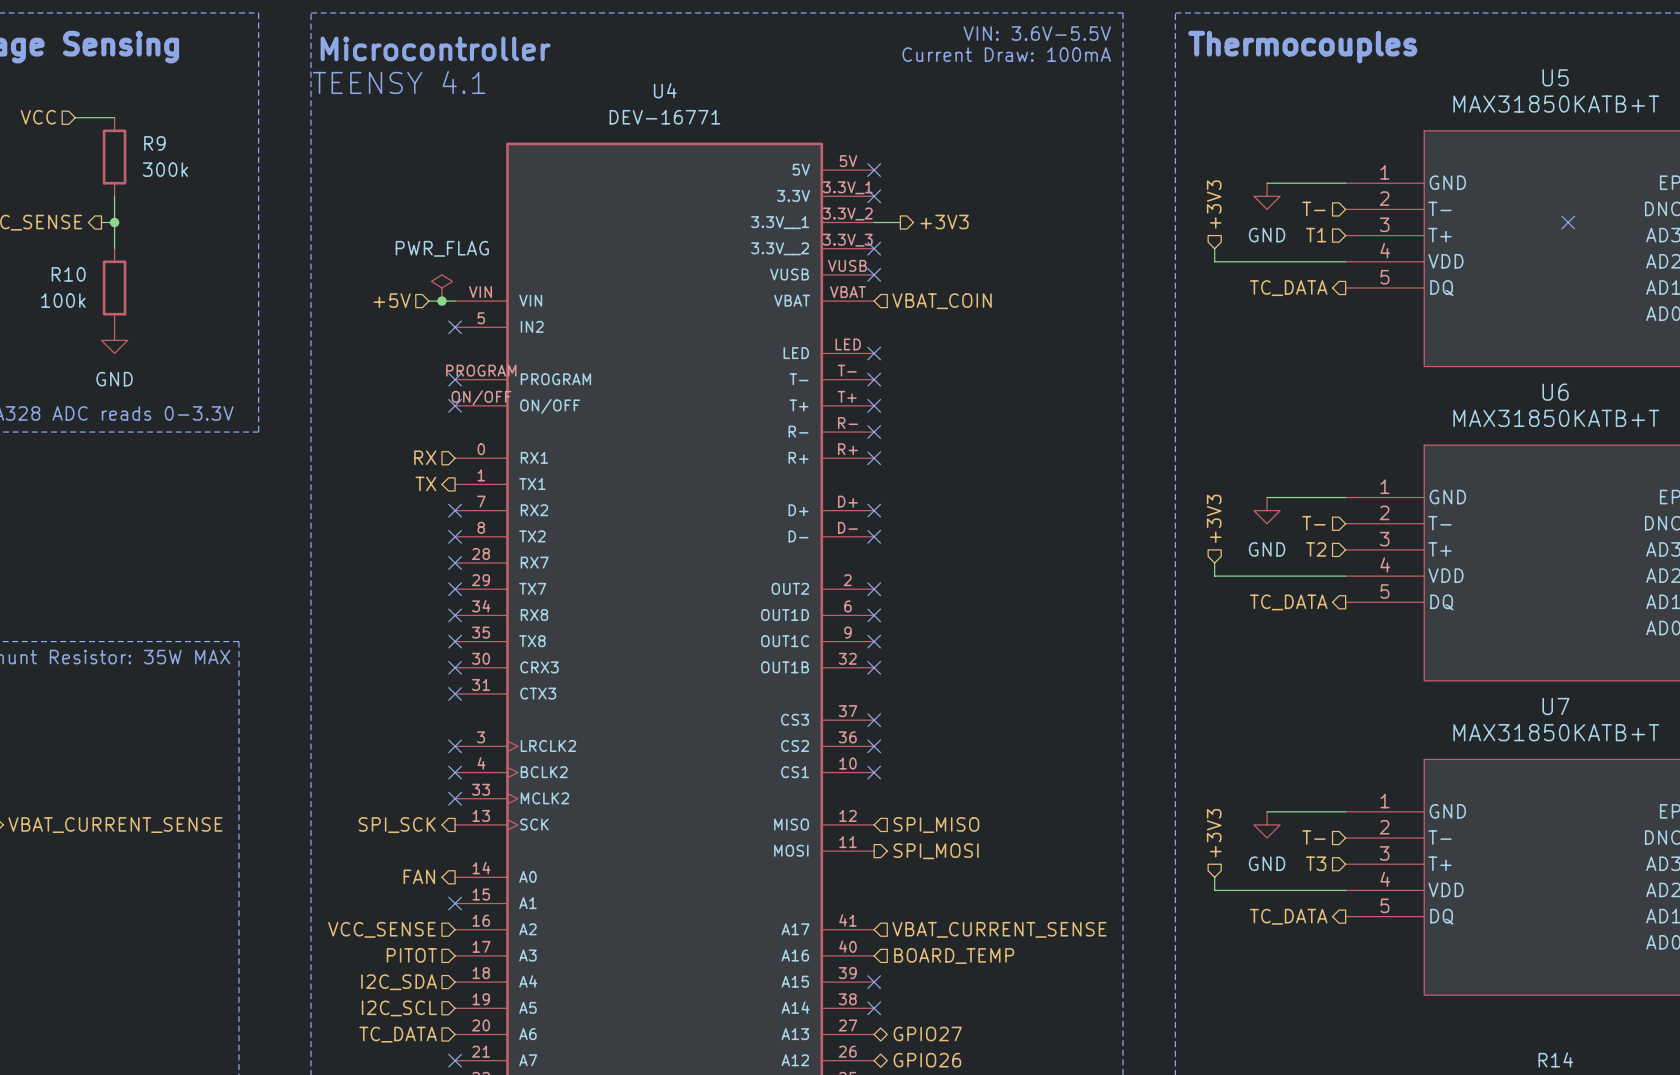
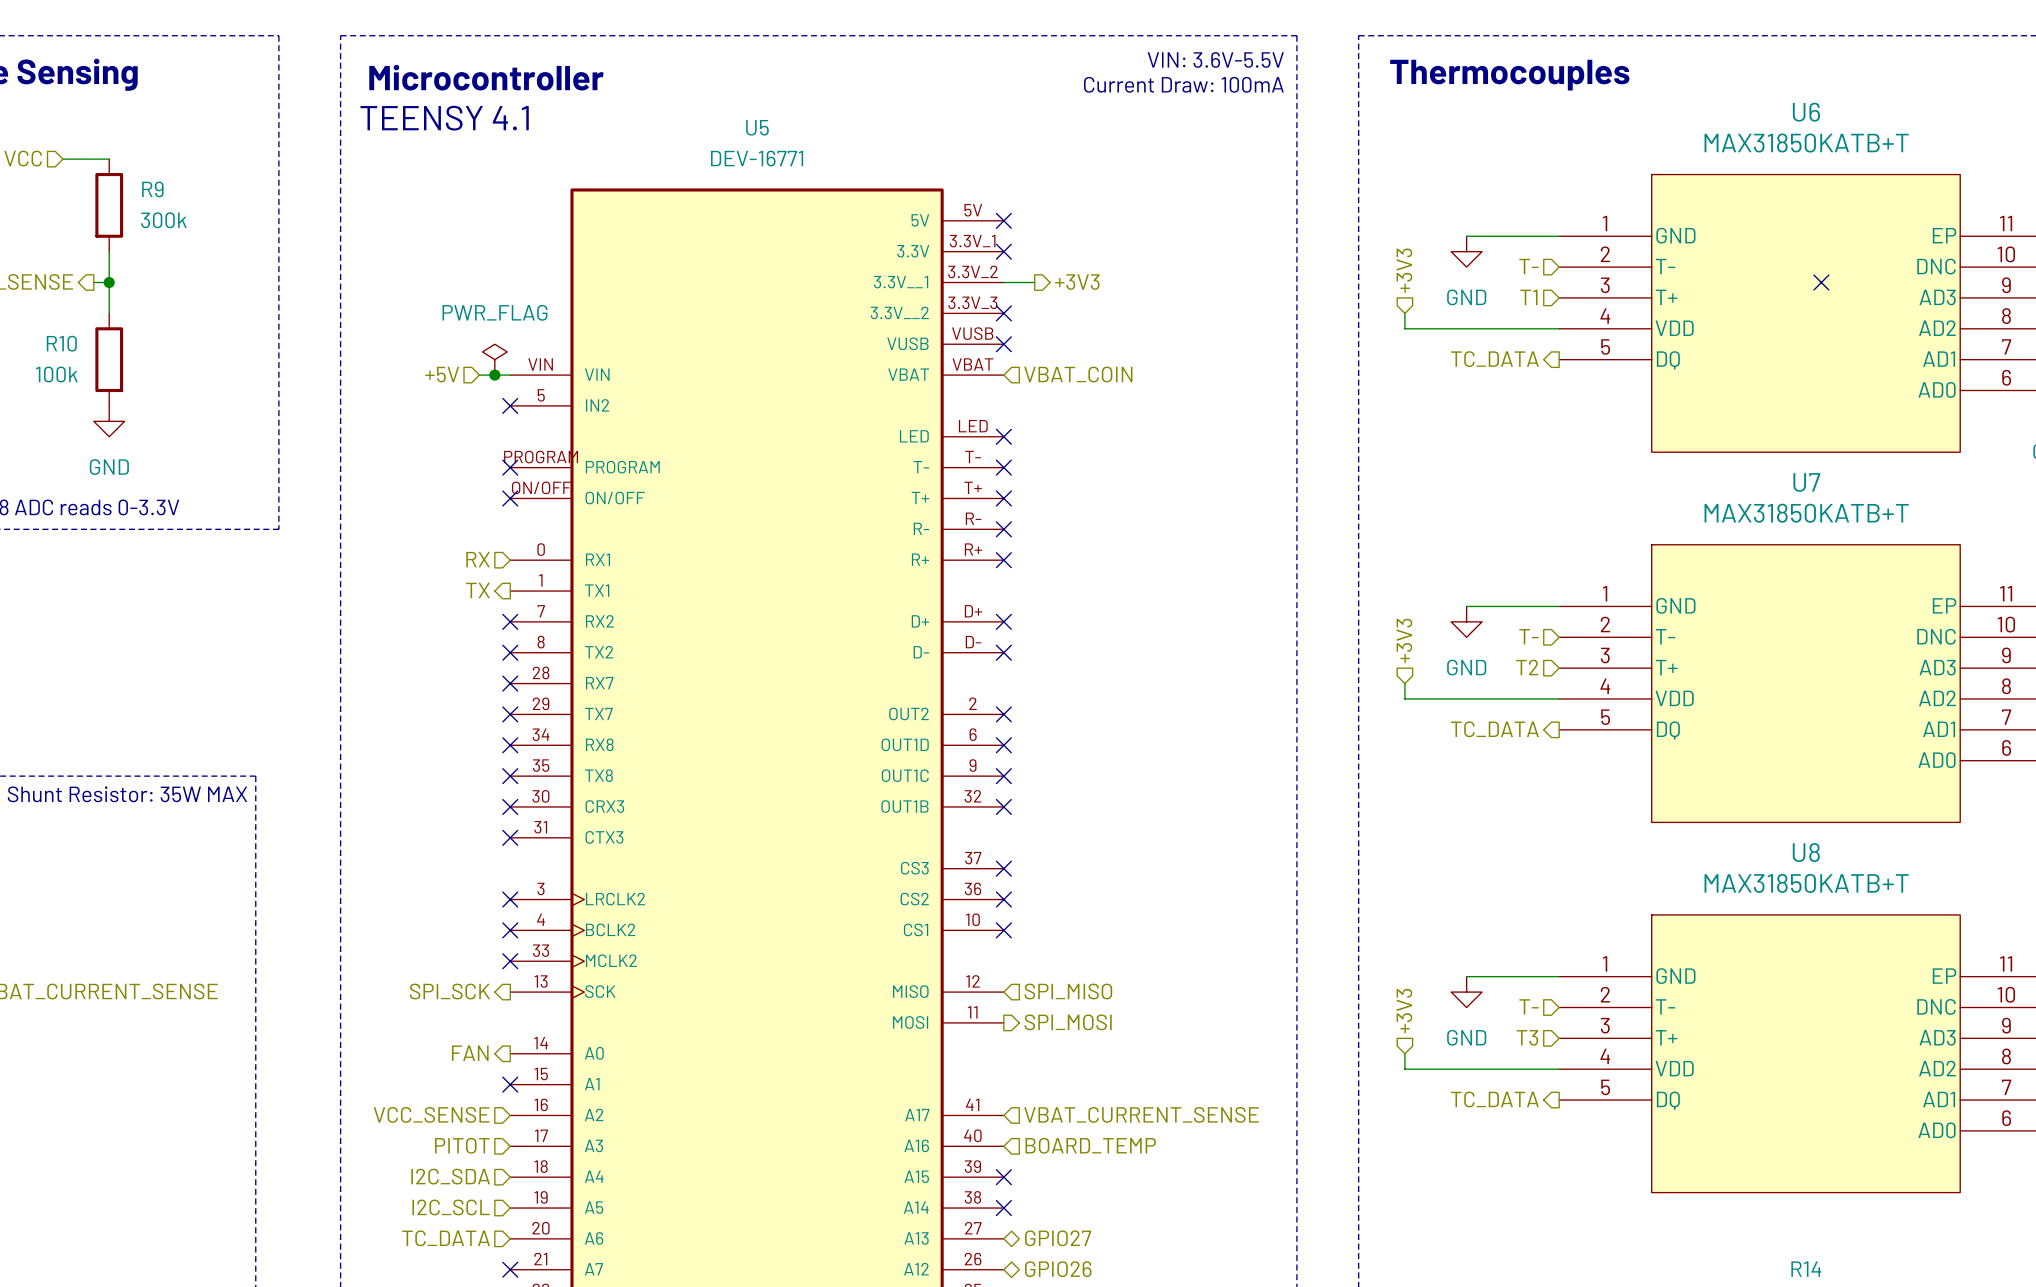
U5 name: U5 (1555, 77) -> U6 (1806, 112)
U4 name: U4 (665, 90) -> U5 (757, 127)
U6 name: U6 (1555, 392) -> U7 (1806, 482)
U7 name: U7 (1555, 706) -> U8 (1806, 852)

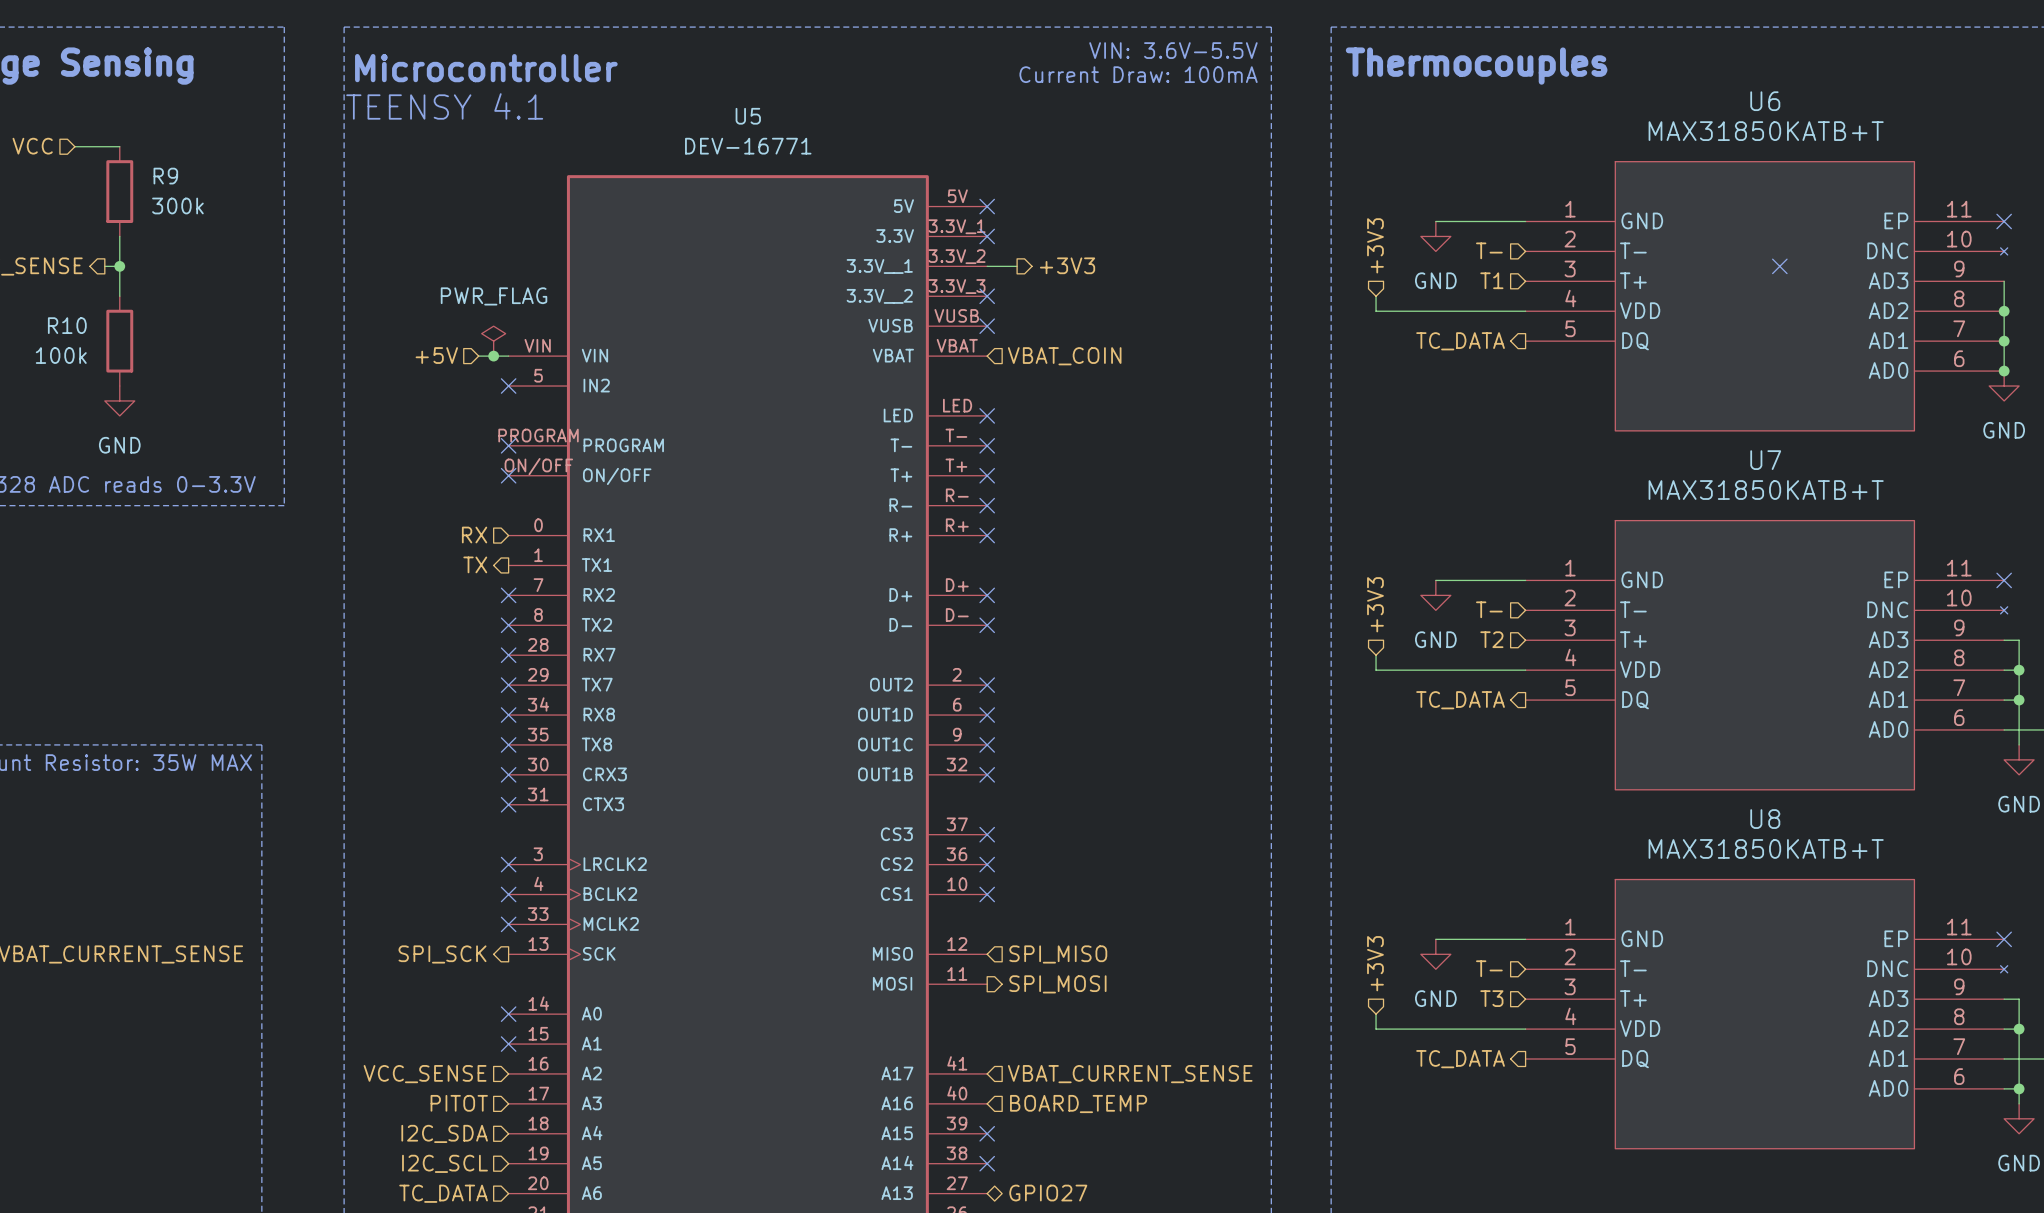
hierarchical label: FAN (470, 1053) -> none
no-connect mark: none -> (508, 1014)

